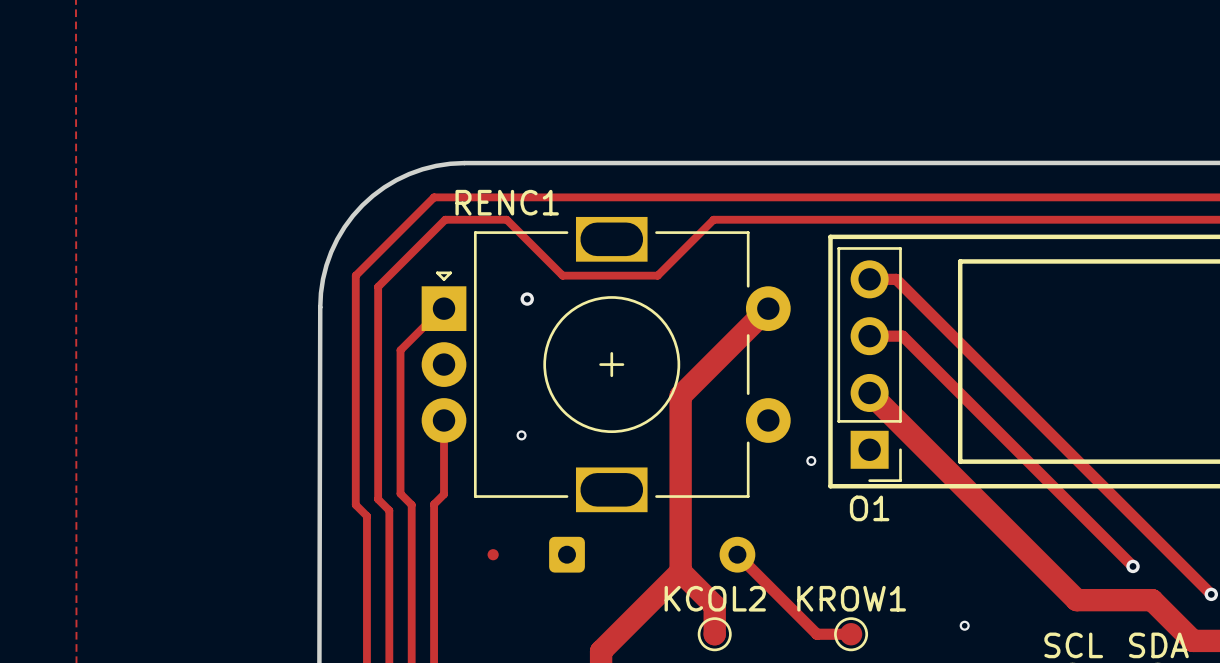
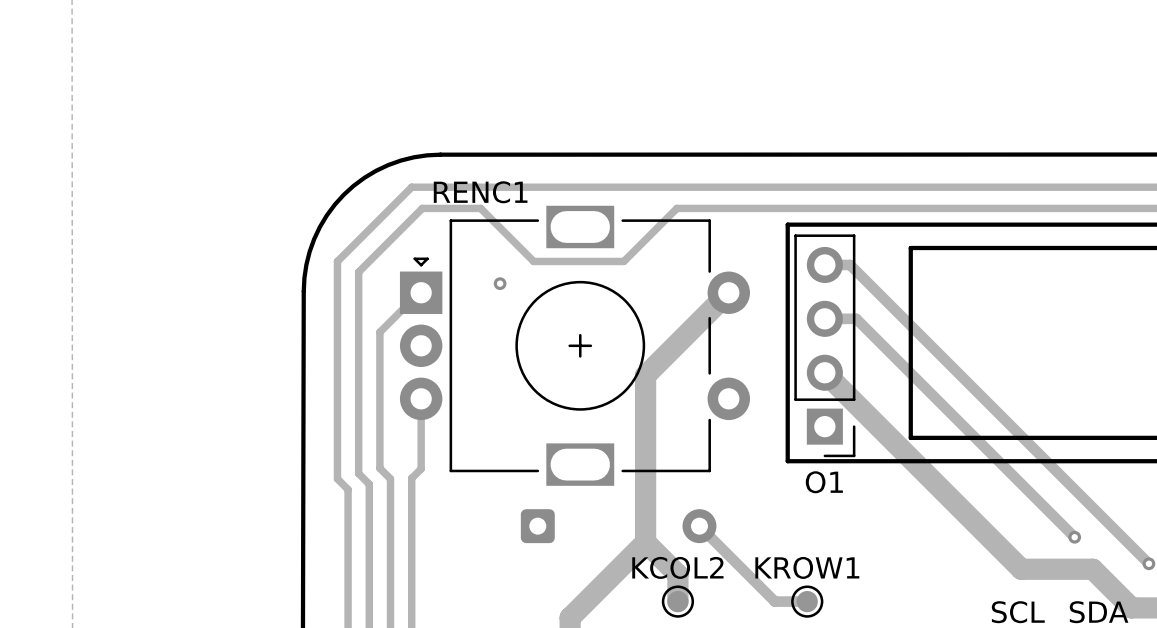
via: (521, 435) -> none
via: (811, 460) -> none
part: (493, 554) -> none
via: (964, 625) -> none

